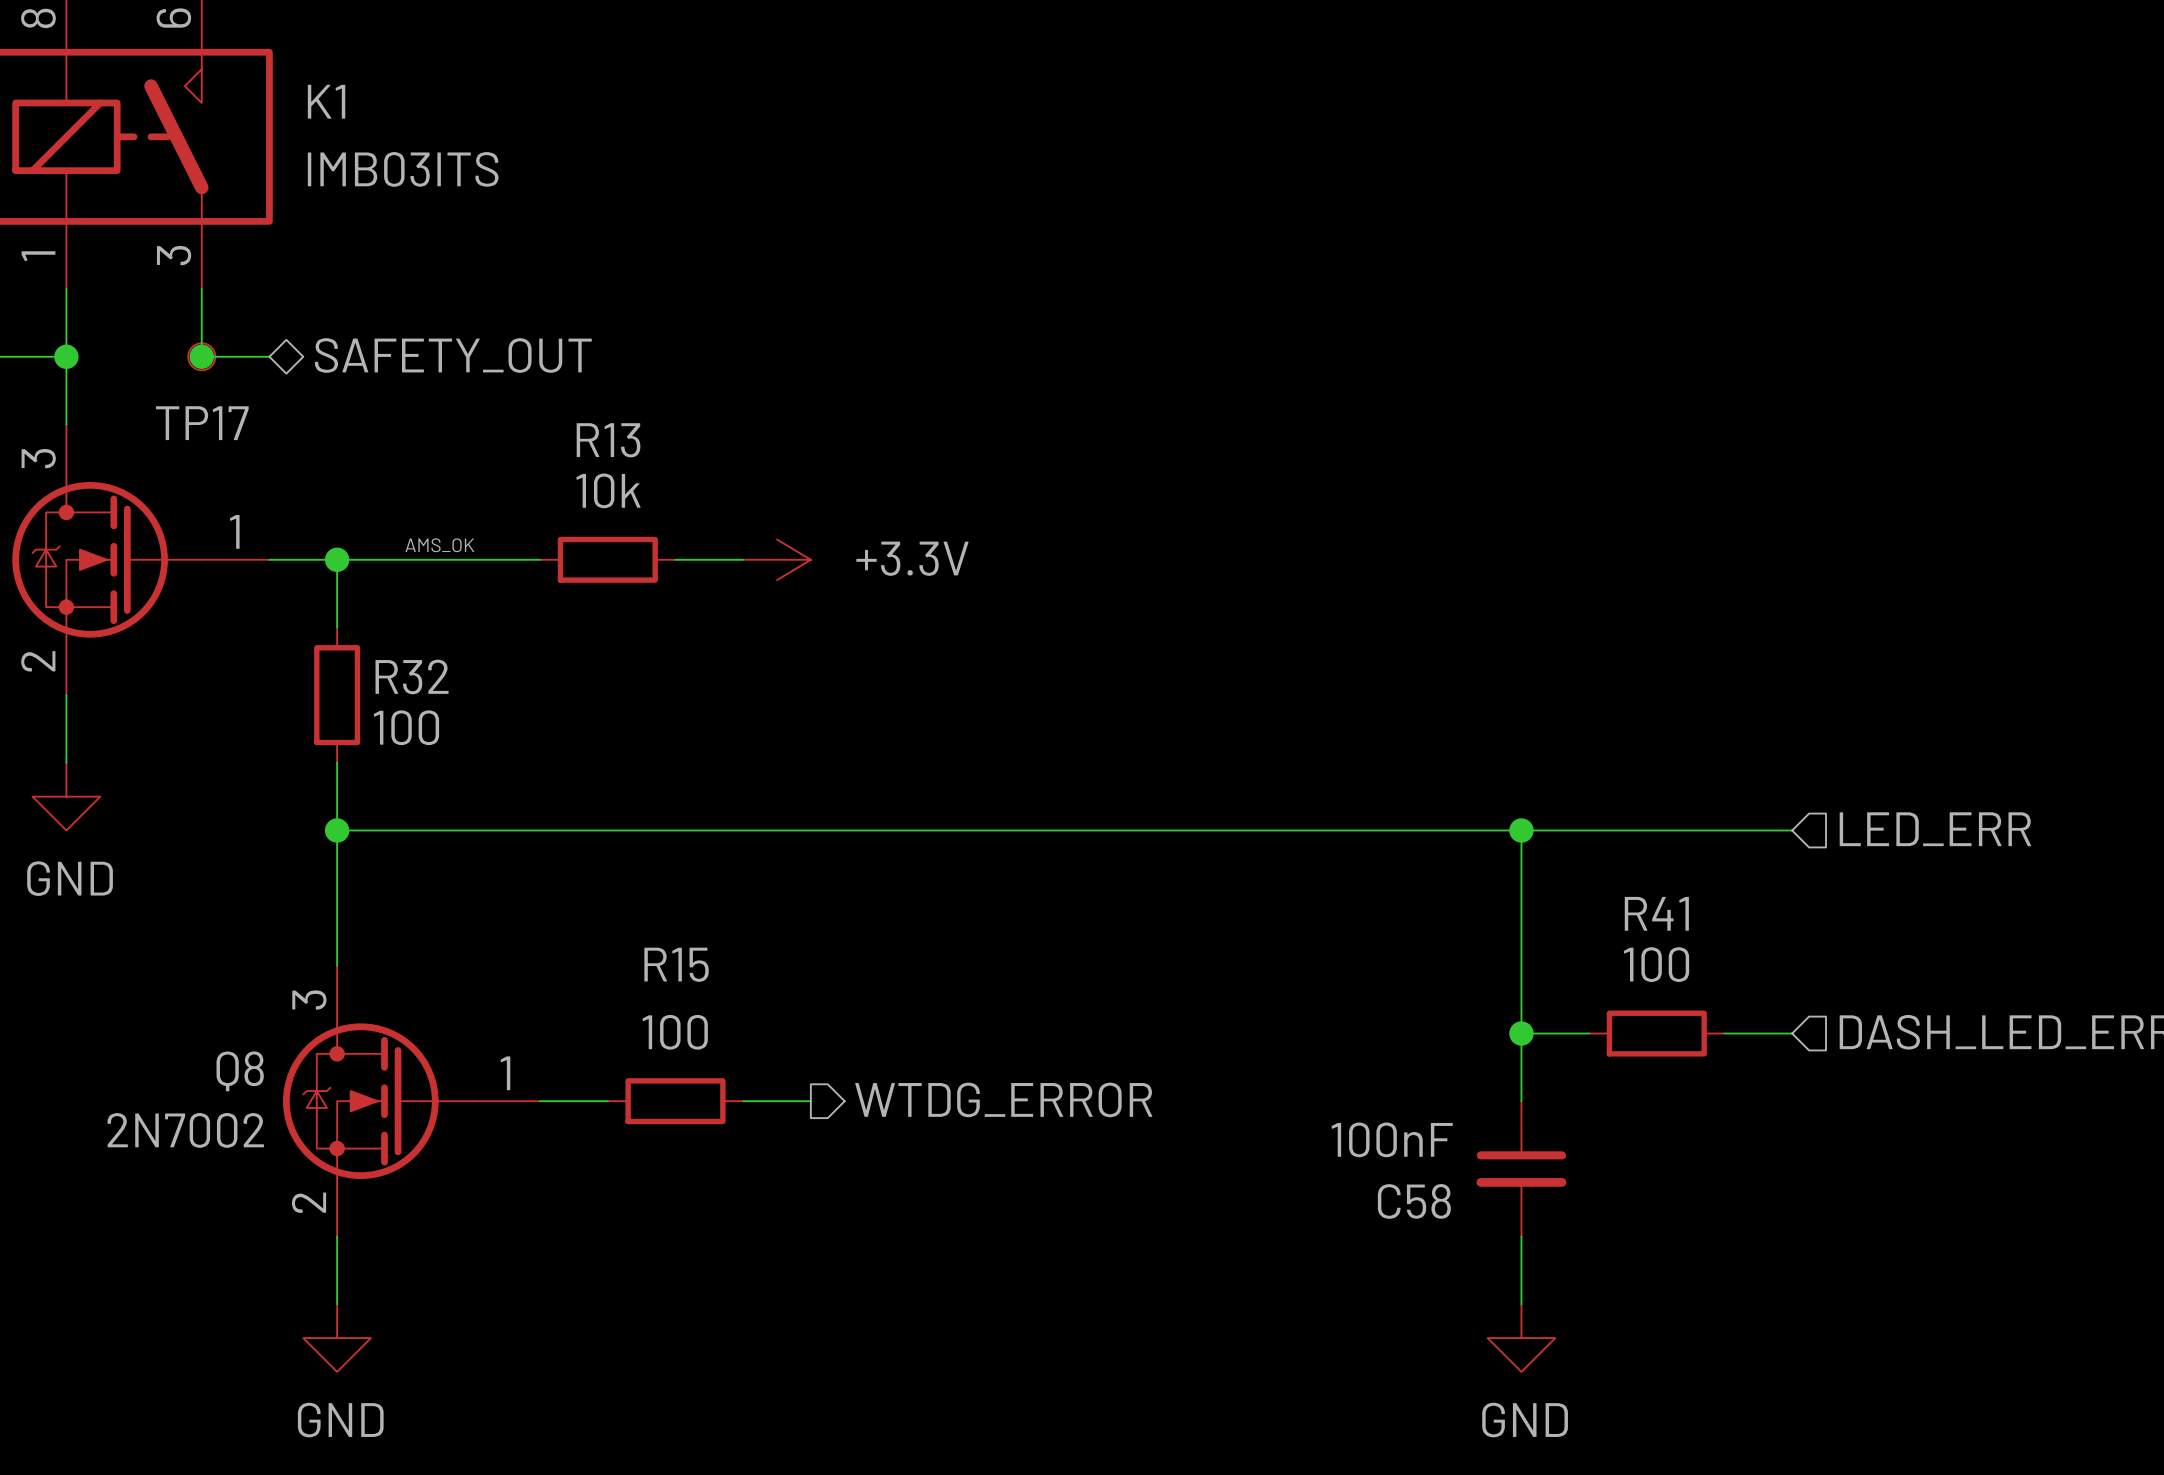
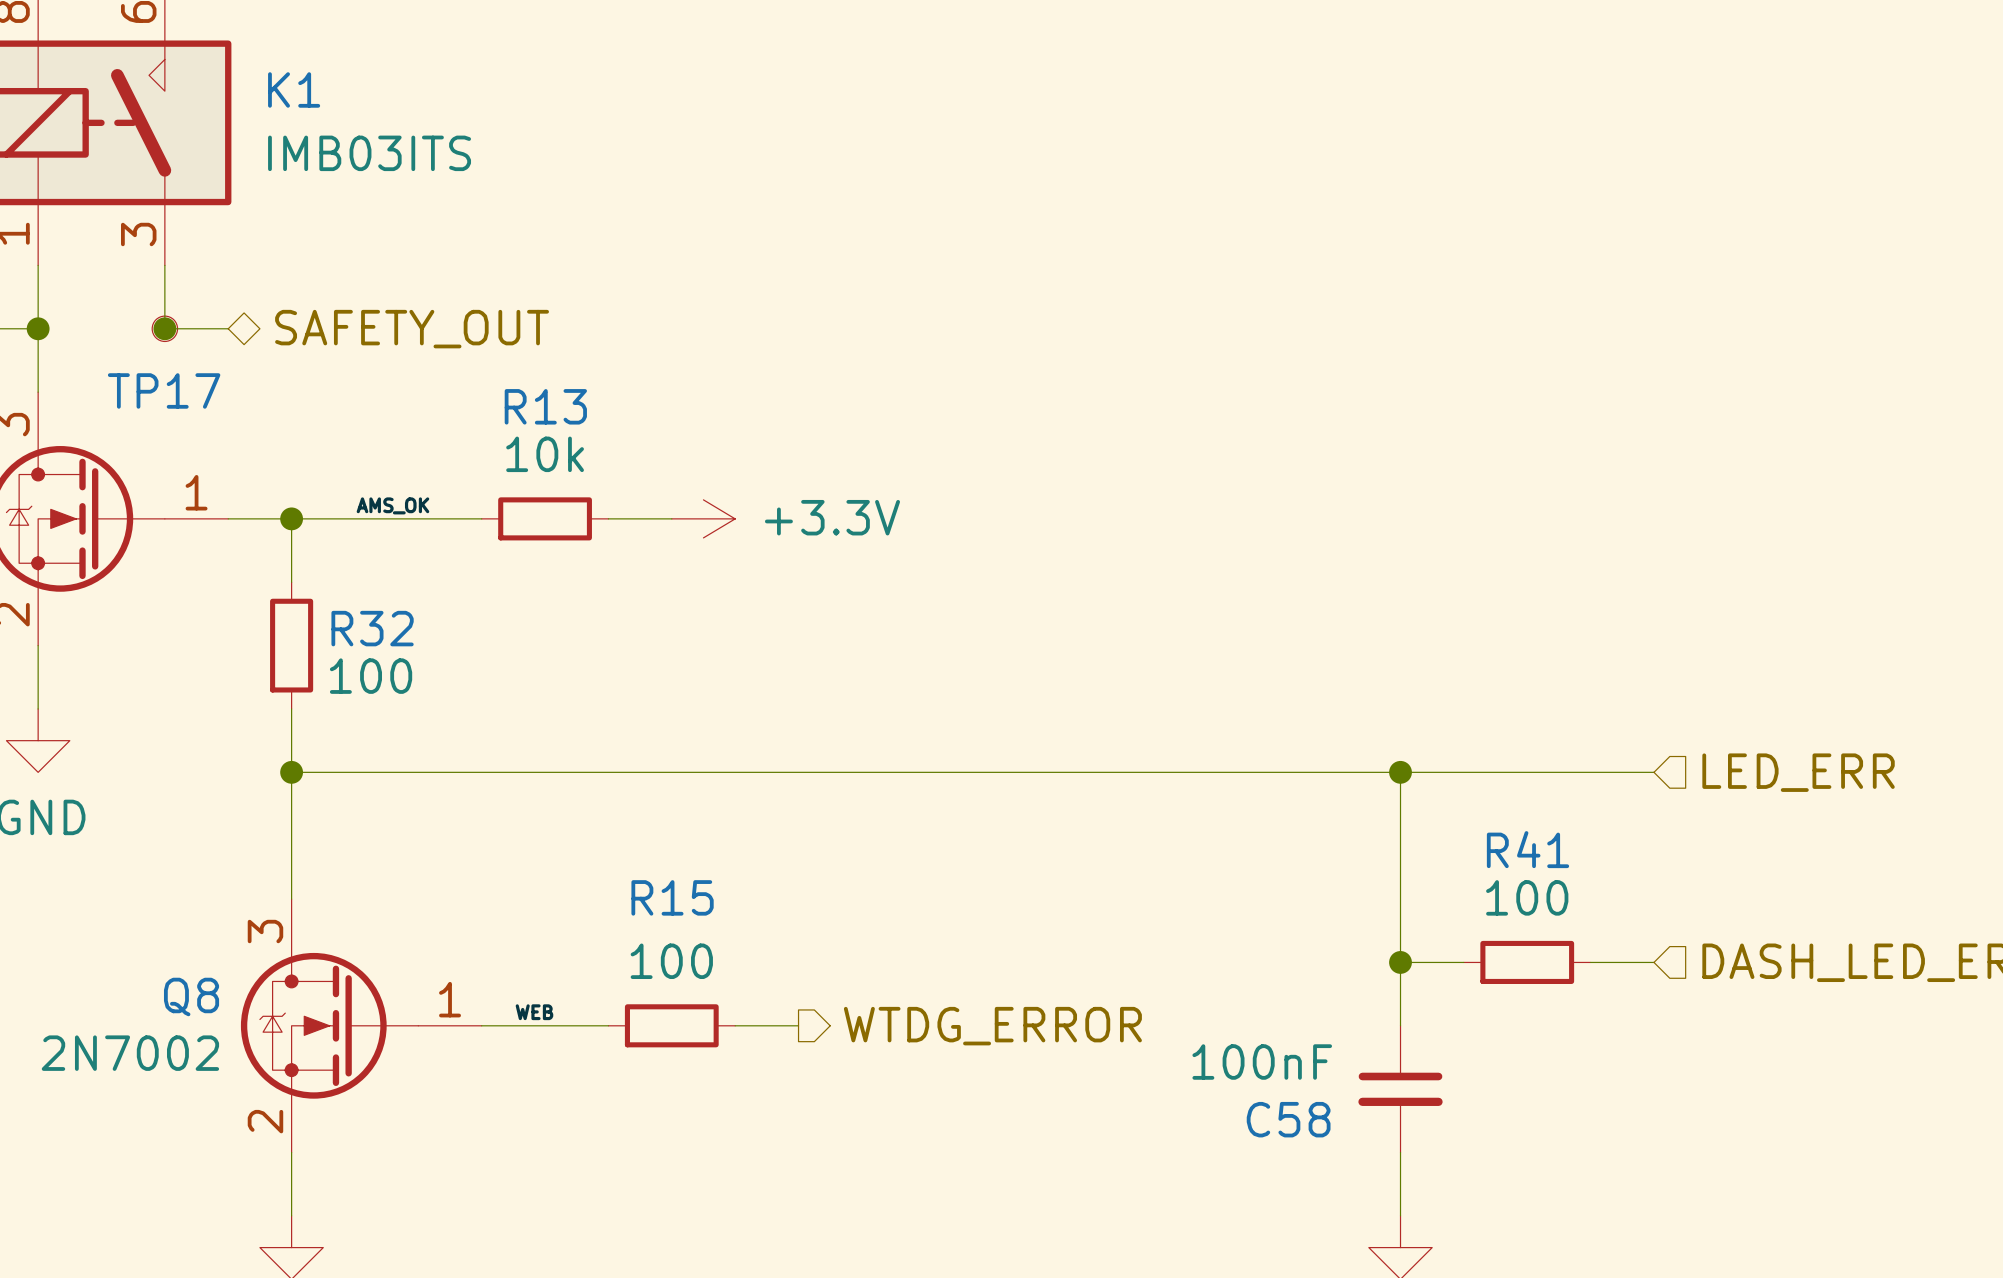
label: none -> WEB (534, 1012)
hierarchical label position: WTDG_ERROR (1003, 1099) -> WTDG_ERROR (992, 1026)
wire: none -> (545, 1025) (608, 1025)
R15 position: (675, 1101) -> (671, 1025)
wire: (743, 1101) (810, 1101) -> (798, 1025) (735, 1025)

